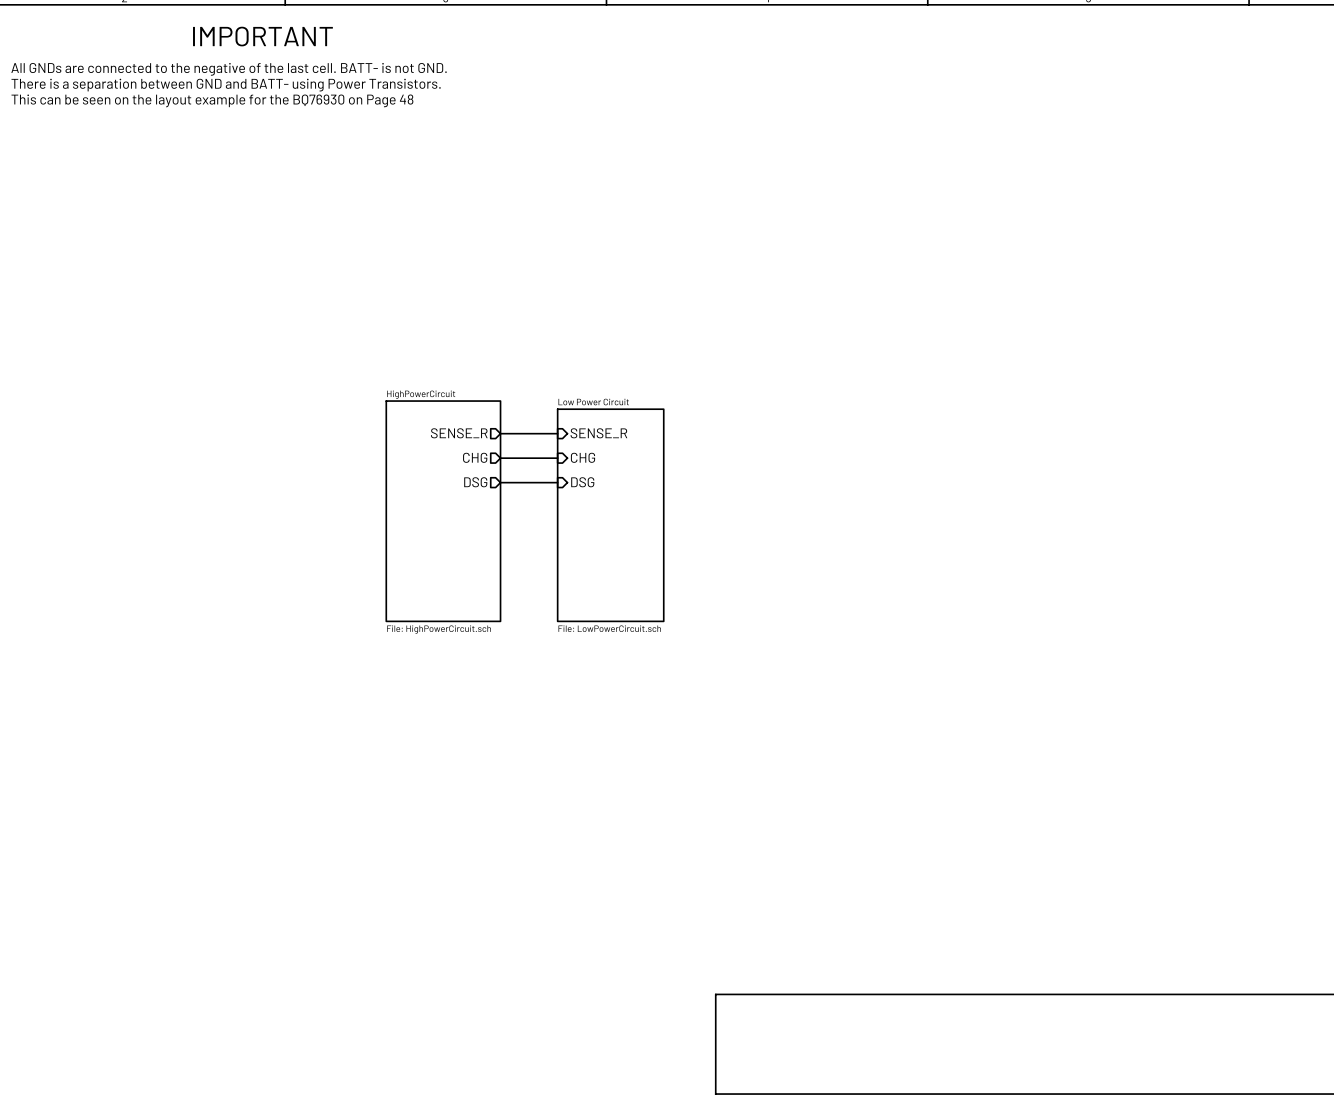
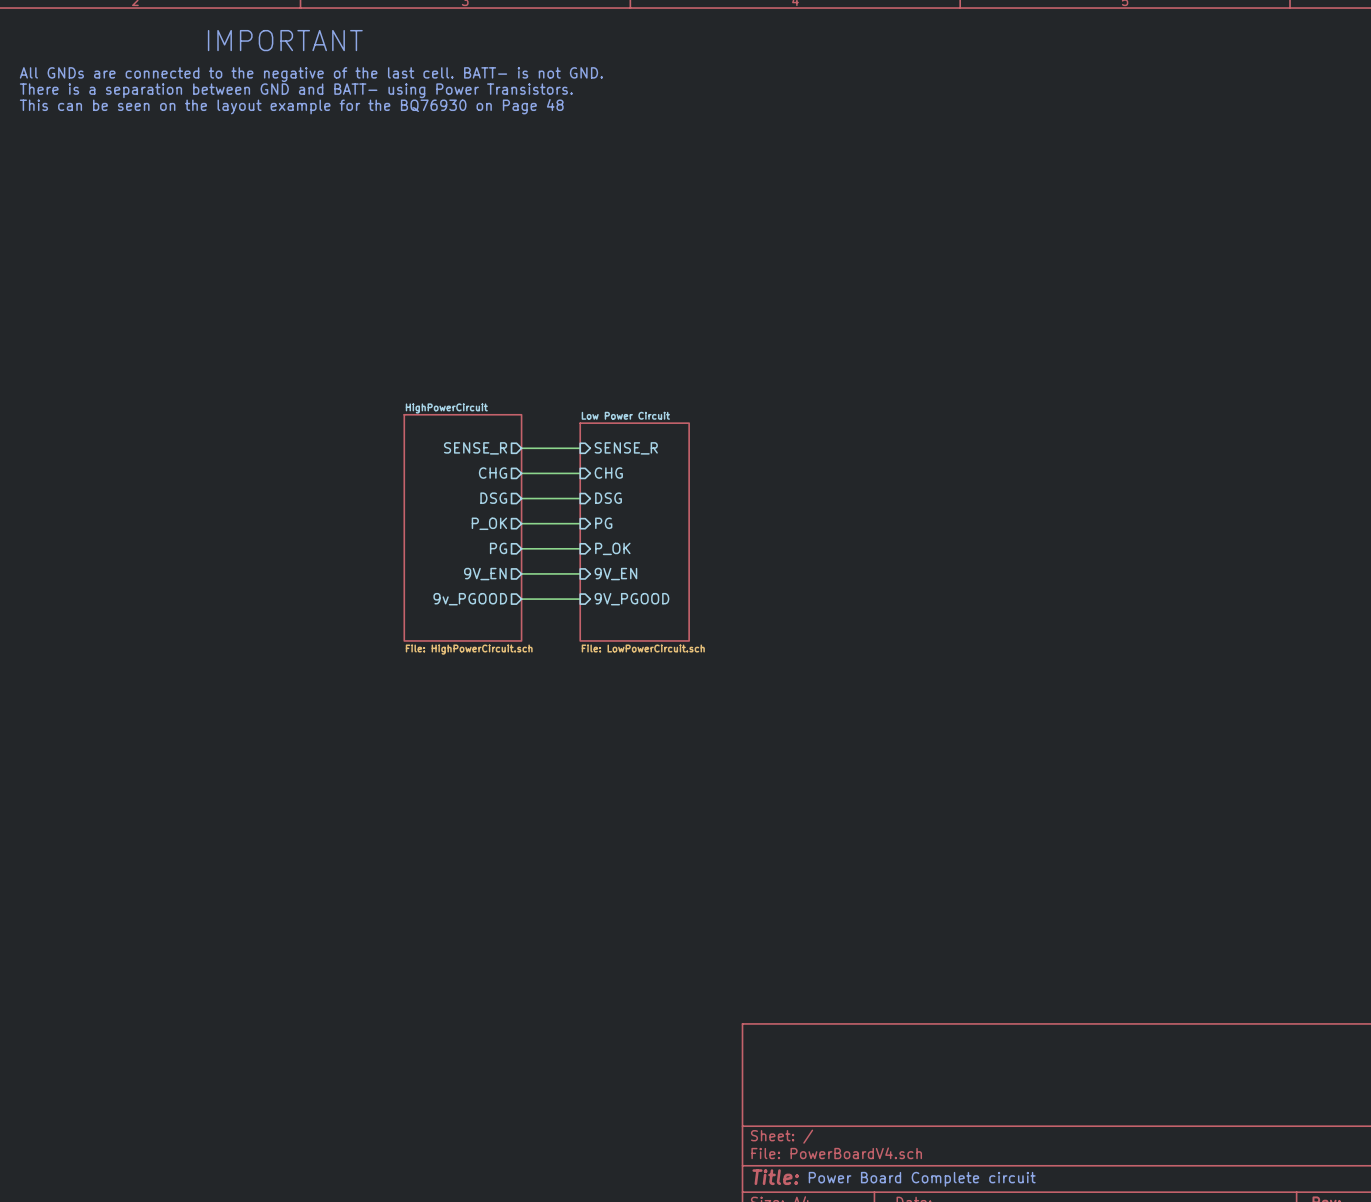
sheet pin: none -> P_OK (489, 523)
sheet pin: none -> PG (603, 523)
wire: none -> (521, 523) (580, 523)
sheet pin: none -> PG (498, 548)
wire: none -> (521, 548) (580, 548)
sheet pin: none -> P_OK (612, 548)
sheet pin: none -> 9V_EN (485, 574)
sheet pin: none -> 9V_EN (615, 574)
wire: none -> (521, 573) (580, 573)
sheet pin: none -> 9v_PGOOD (470, 599)
wire: none -> (521, 599) (580, 599)
sheet pin: none -> 9V_PGOOD (631, 599)

